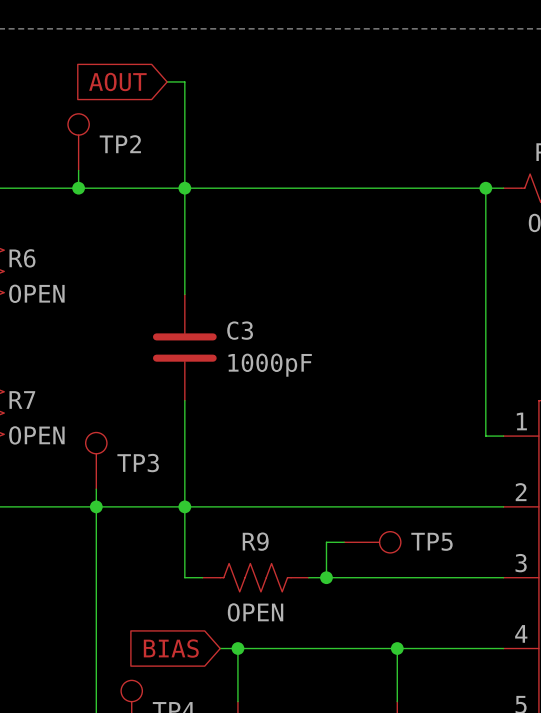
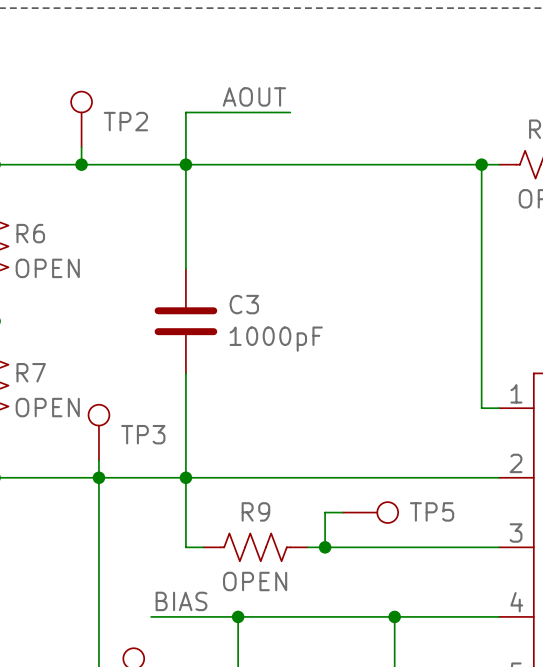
global label: AOUT (117, 81) -> none
wire: (167, 81) (184, 81) (184, 135) -> (290, 112) (185, 112)
label: none -> AOUT (254, 96)
label: none -> BIAS (181, 601)
wire: none -> (151, 616) (220, 616)
global label: BIAS (171, 648) -> none

